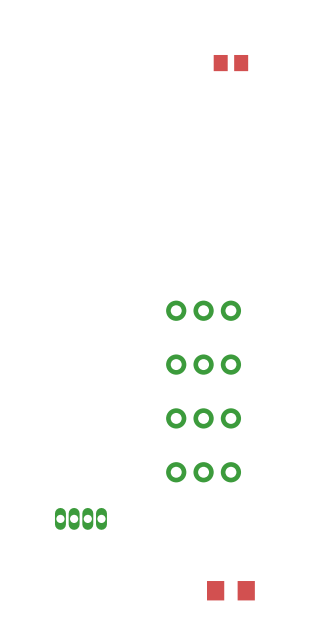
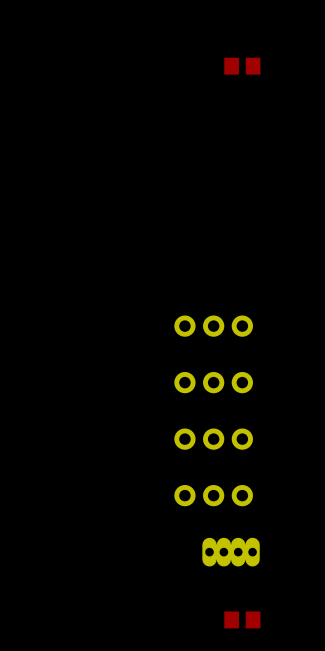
part: (80, 518) -> none
part: none -> (231, 552)
part footprint: [207, 581, 255, 601] -> [224, 611, 261, 629]

